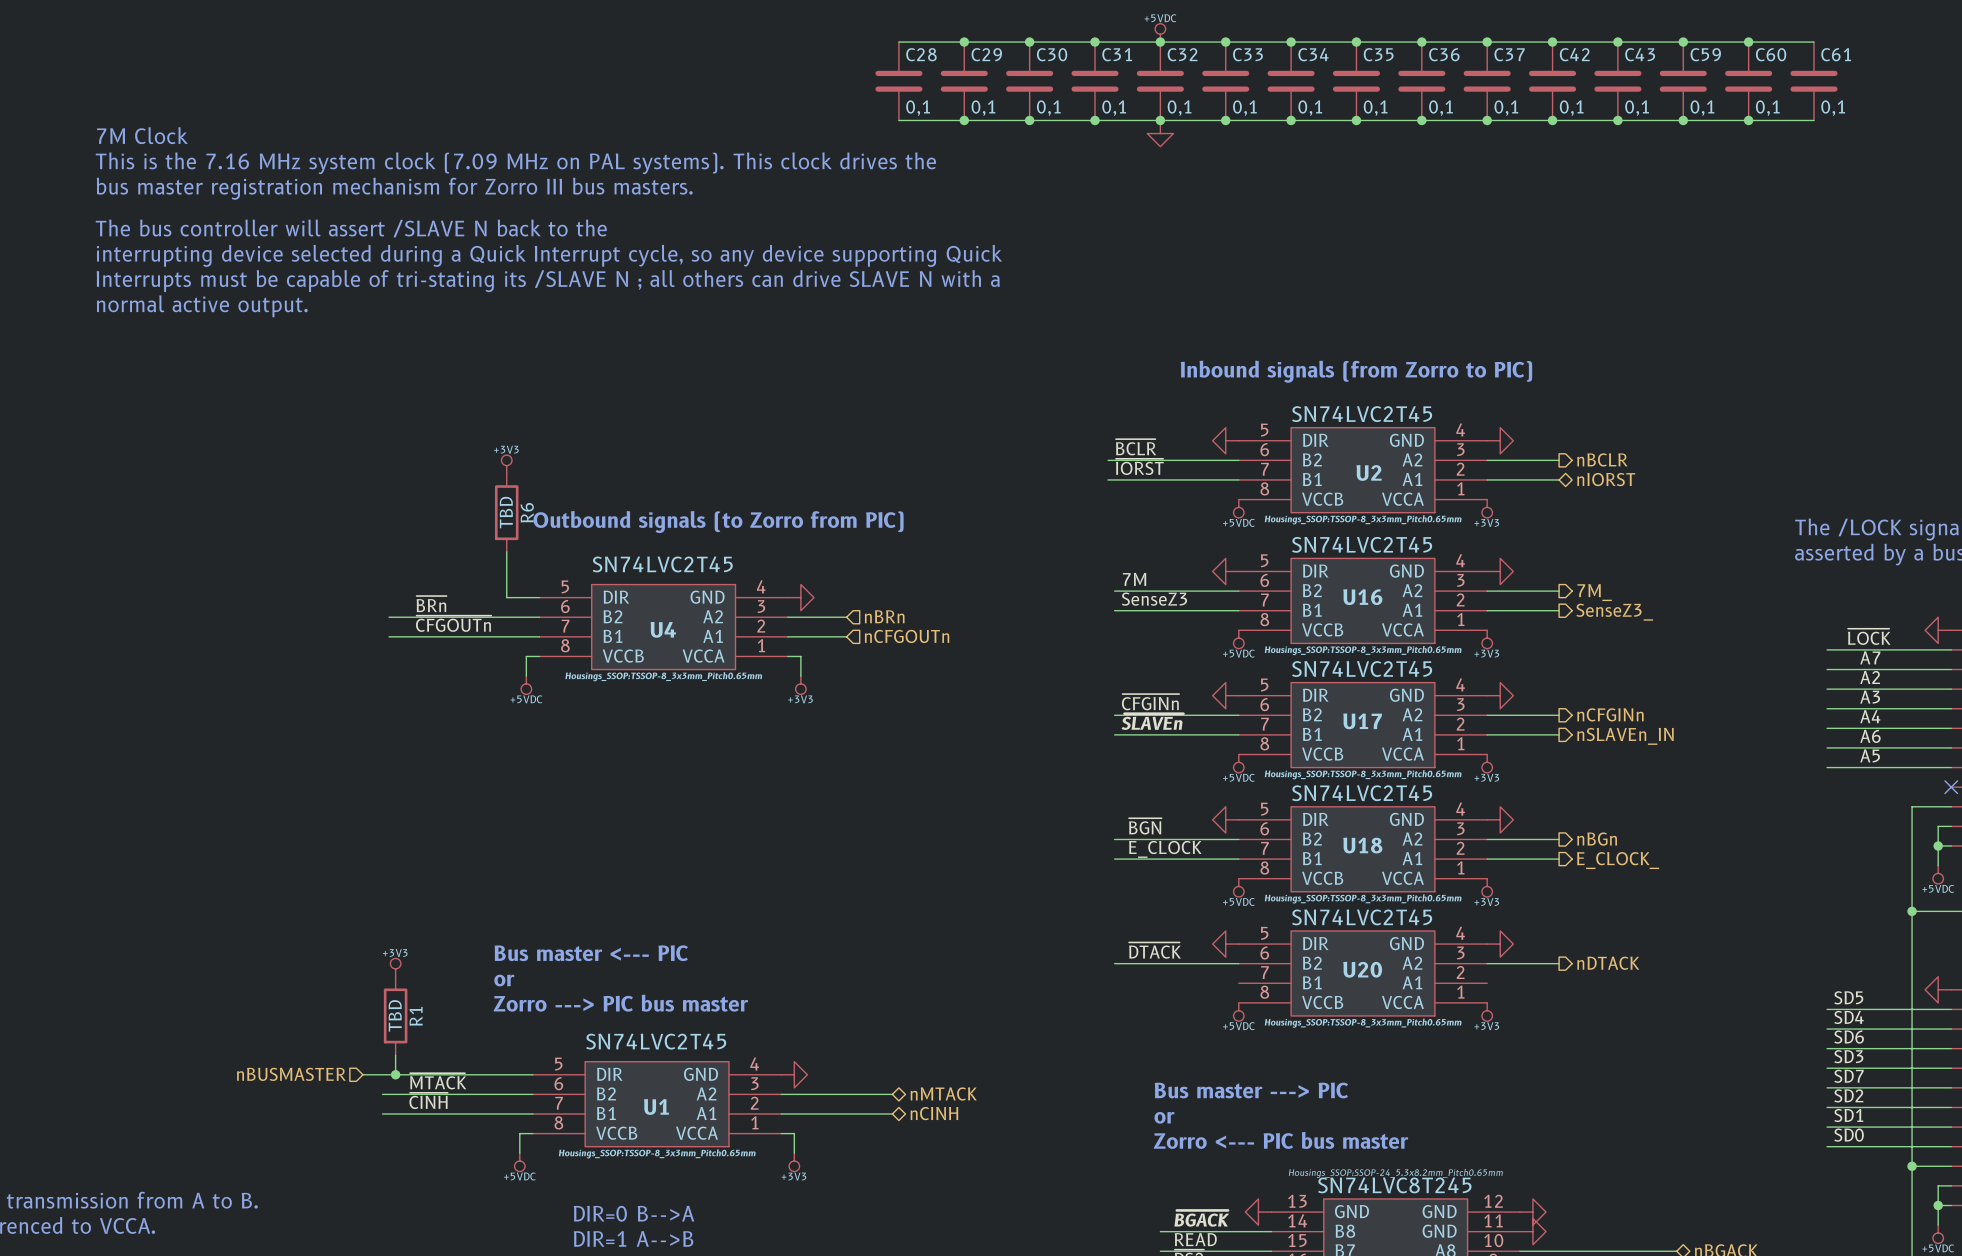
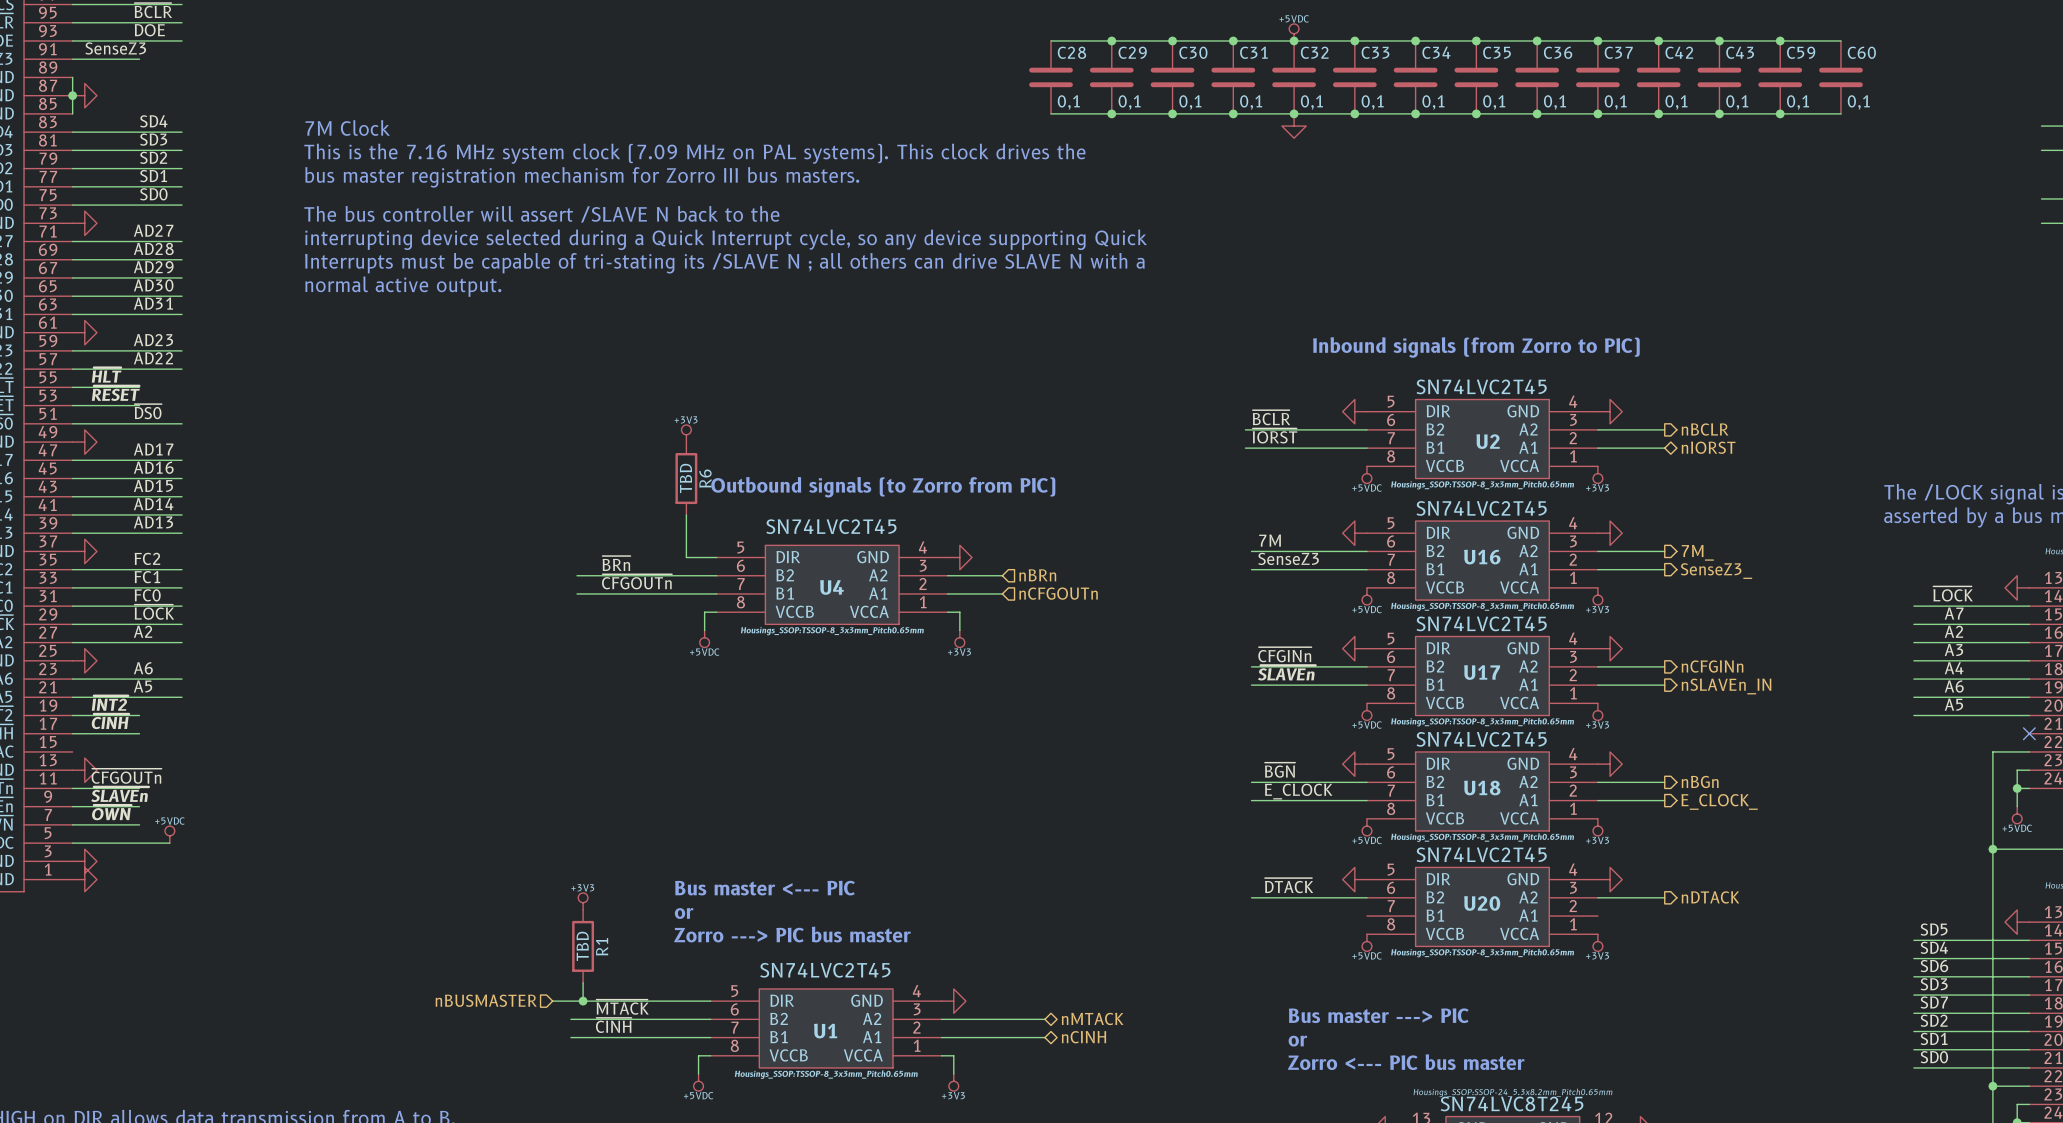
wire: (1748, 42) (1814, 42) -> none
junction: (1748, 42) -> none
C61: 0,1 (1814, 81) -> none
wire: (1748, 120) (1814, 120) -> none
junction: (1748, 120) -> none

